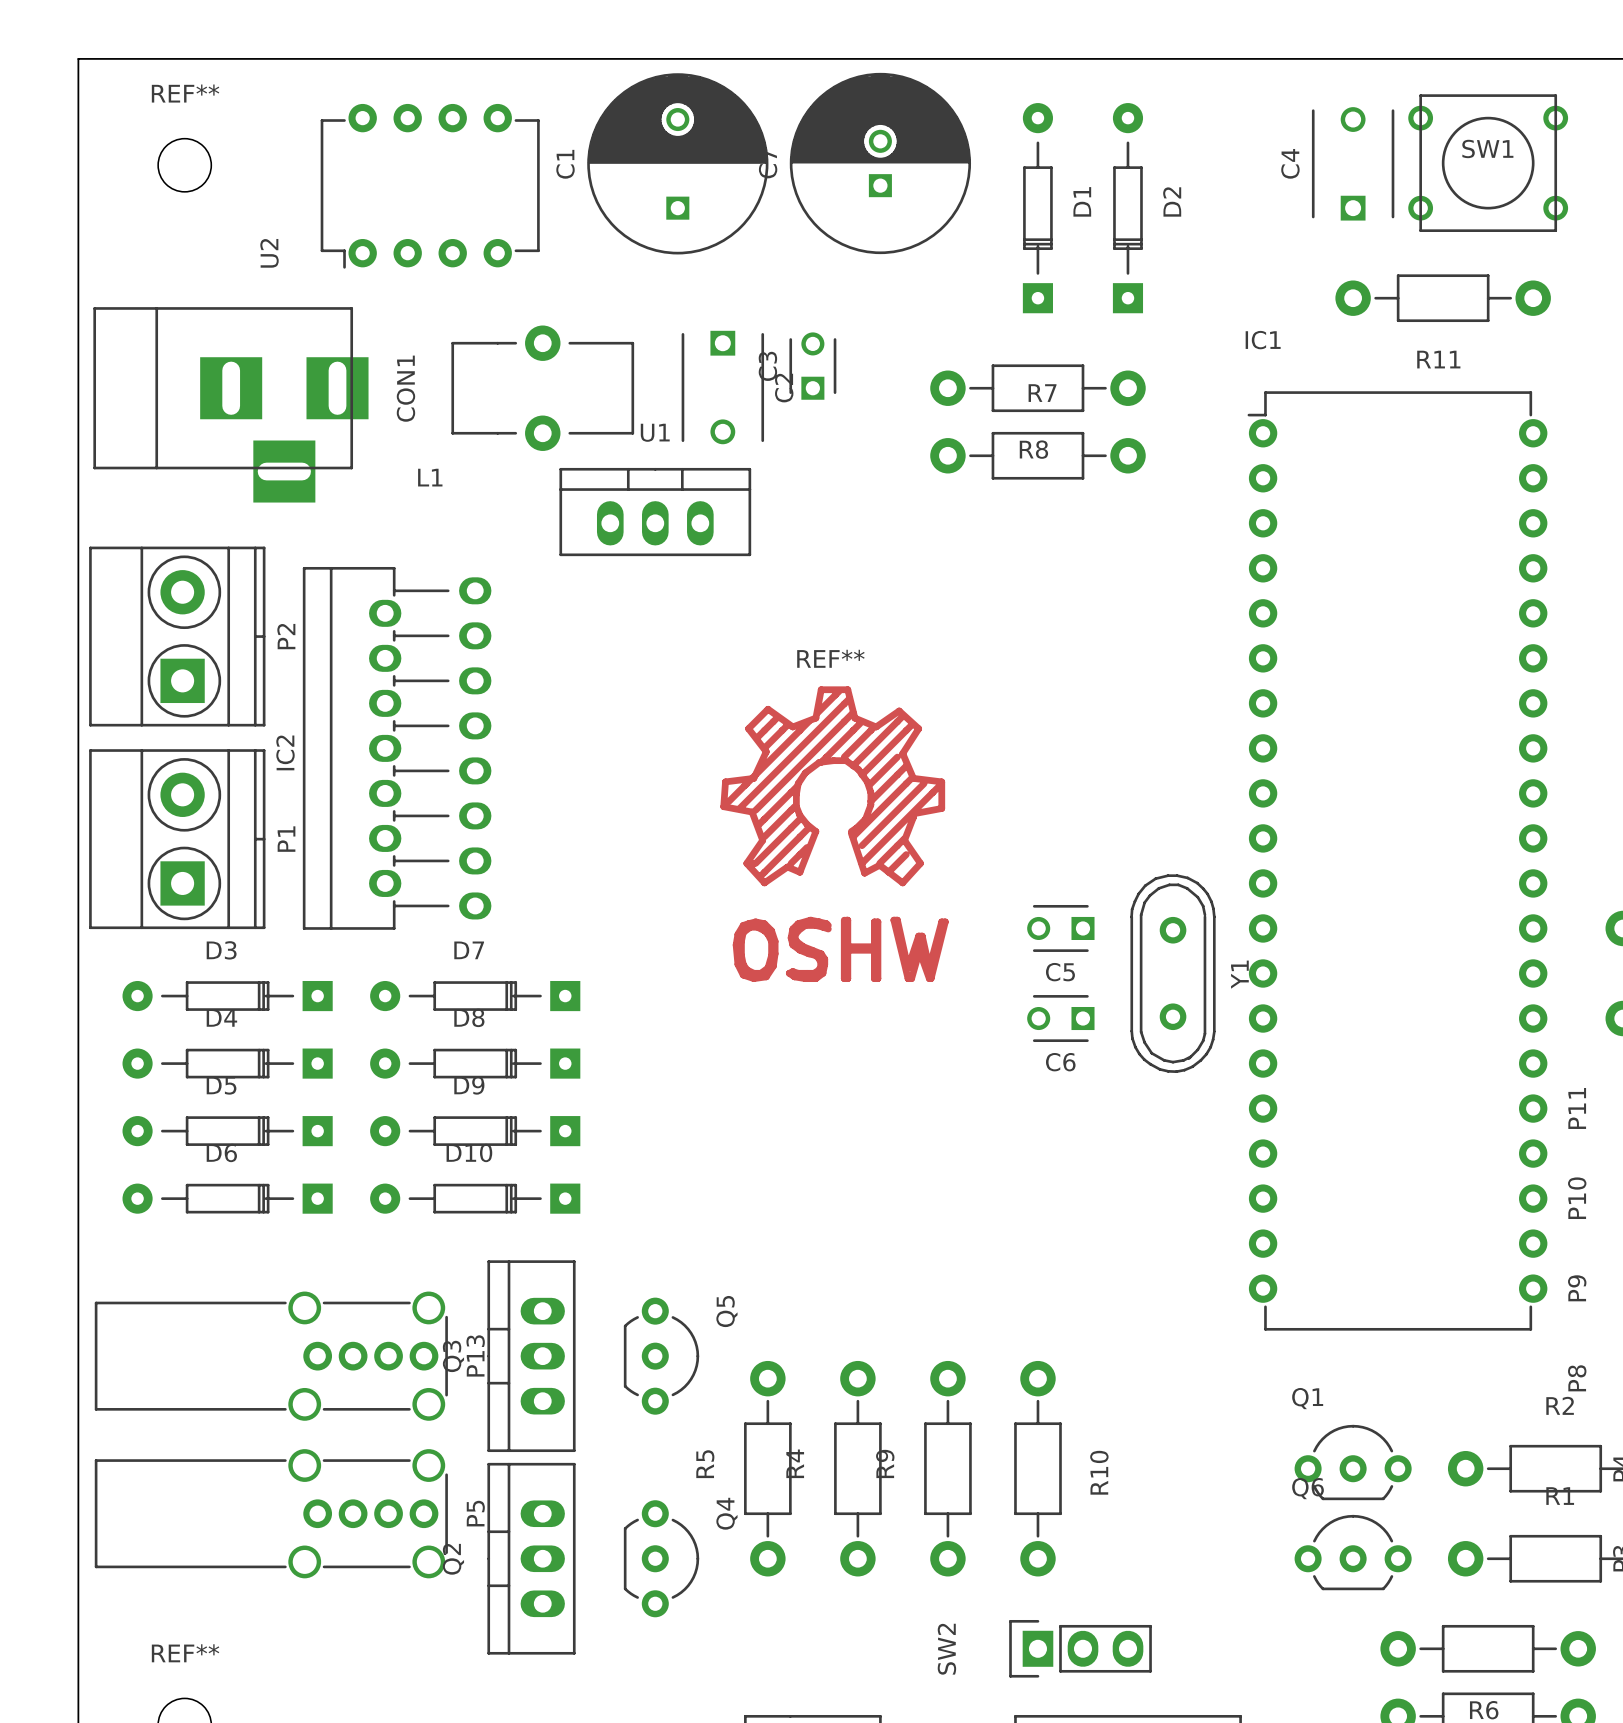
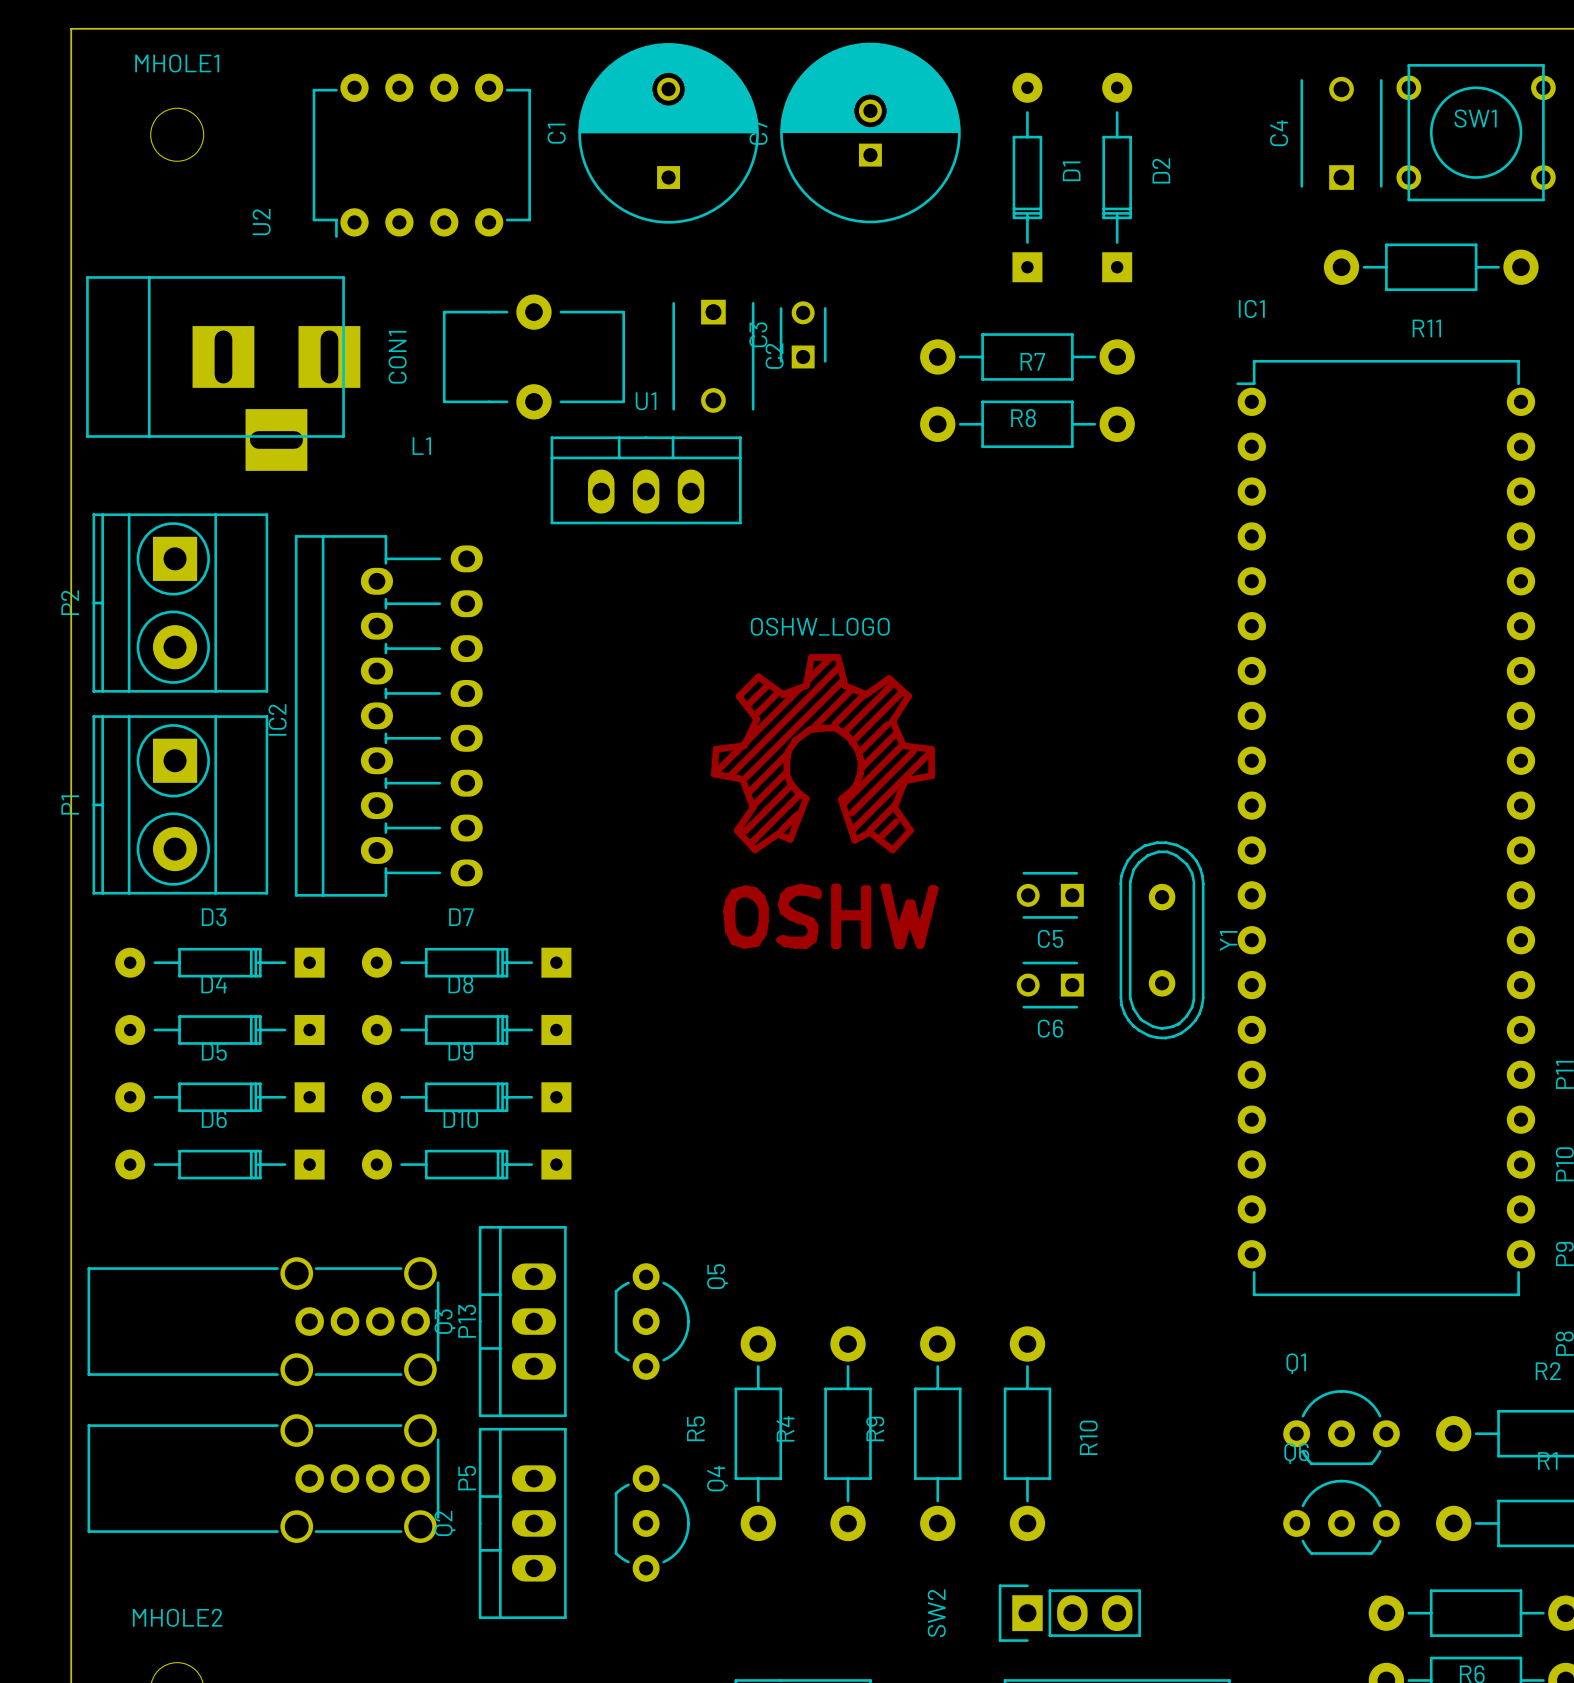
REF** name: REF** (185, 93) -> MHOLE1 (177, 63)
P2 rotation: 0° (177, 636) -> 180° (180, 603)
REF** name: REF** (830, 658) -> OSHW_LOGO (820, 626)
P1 rotation: 0° (177, 839) -> 180° (180, 804)
REF** name: REF** (185, 1653) -> MHOLE2 (177, 1617)

